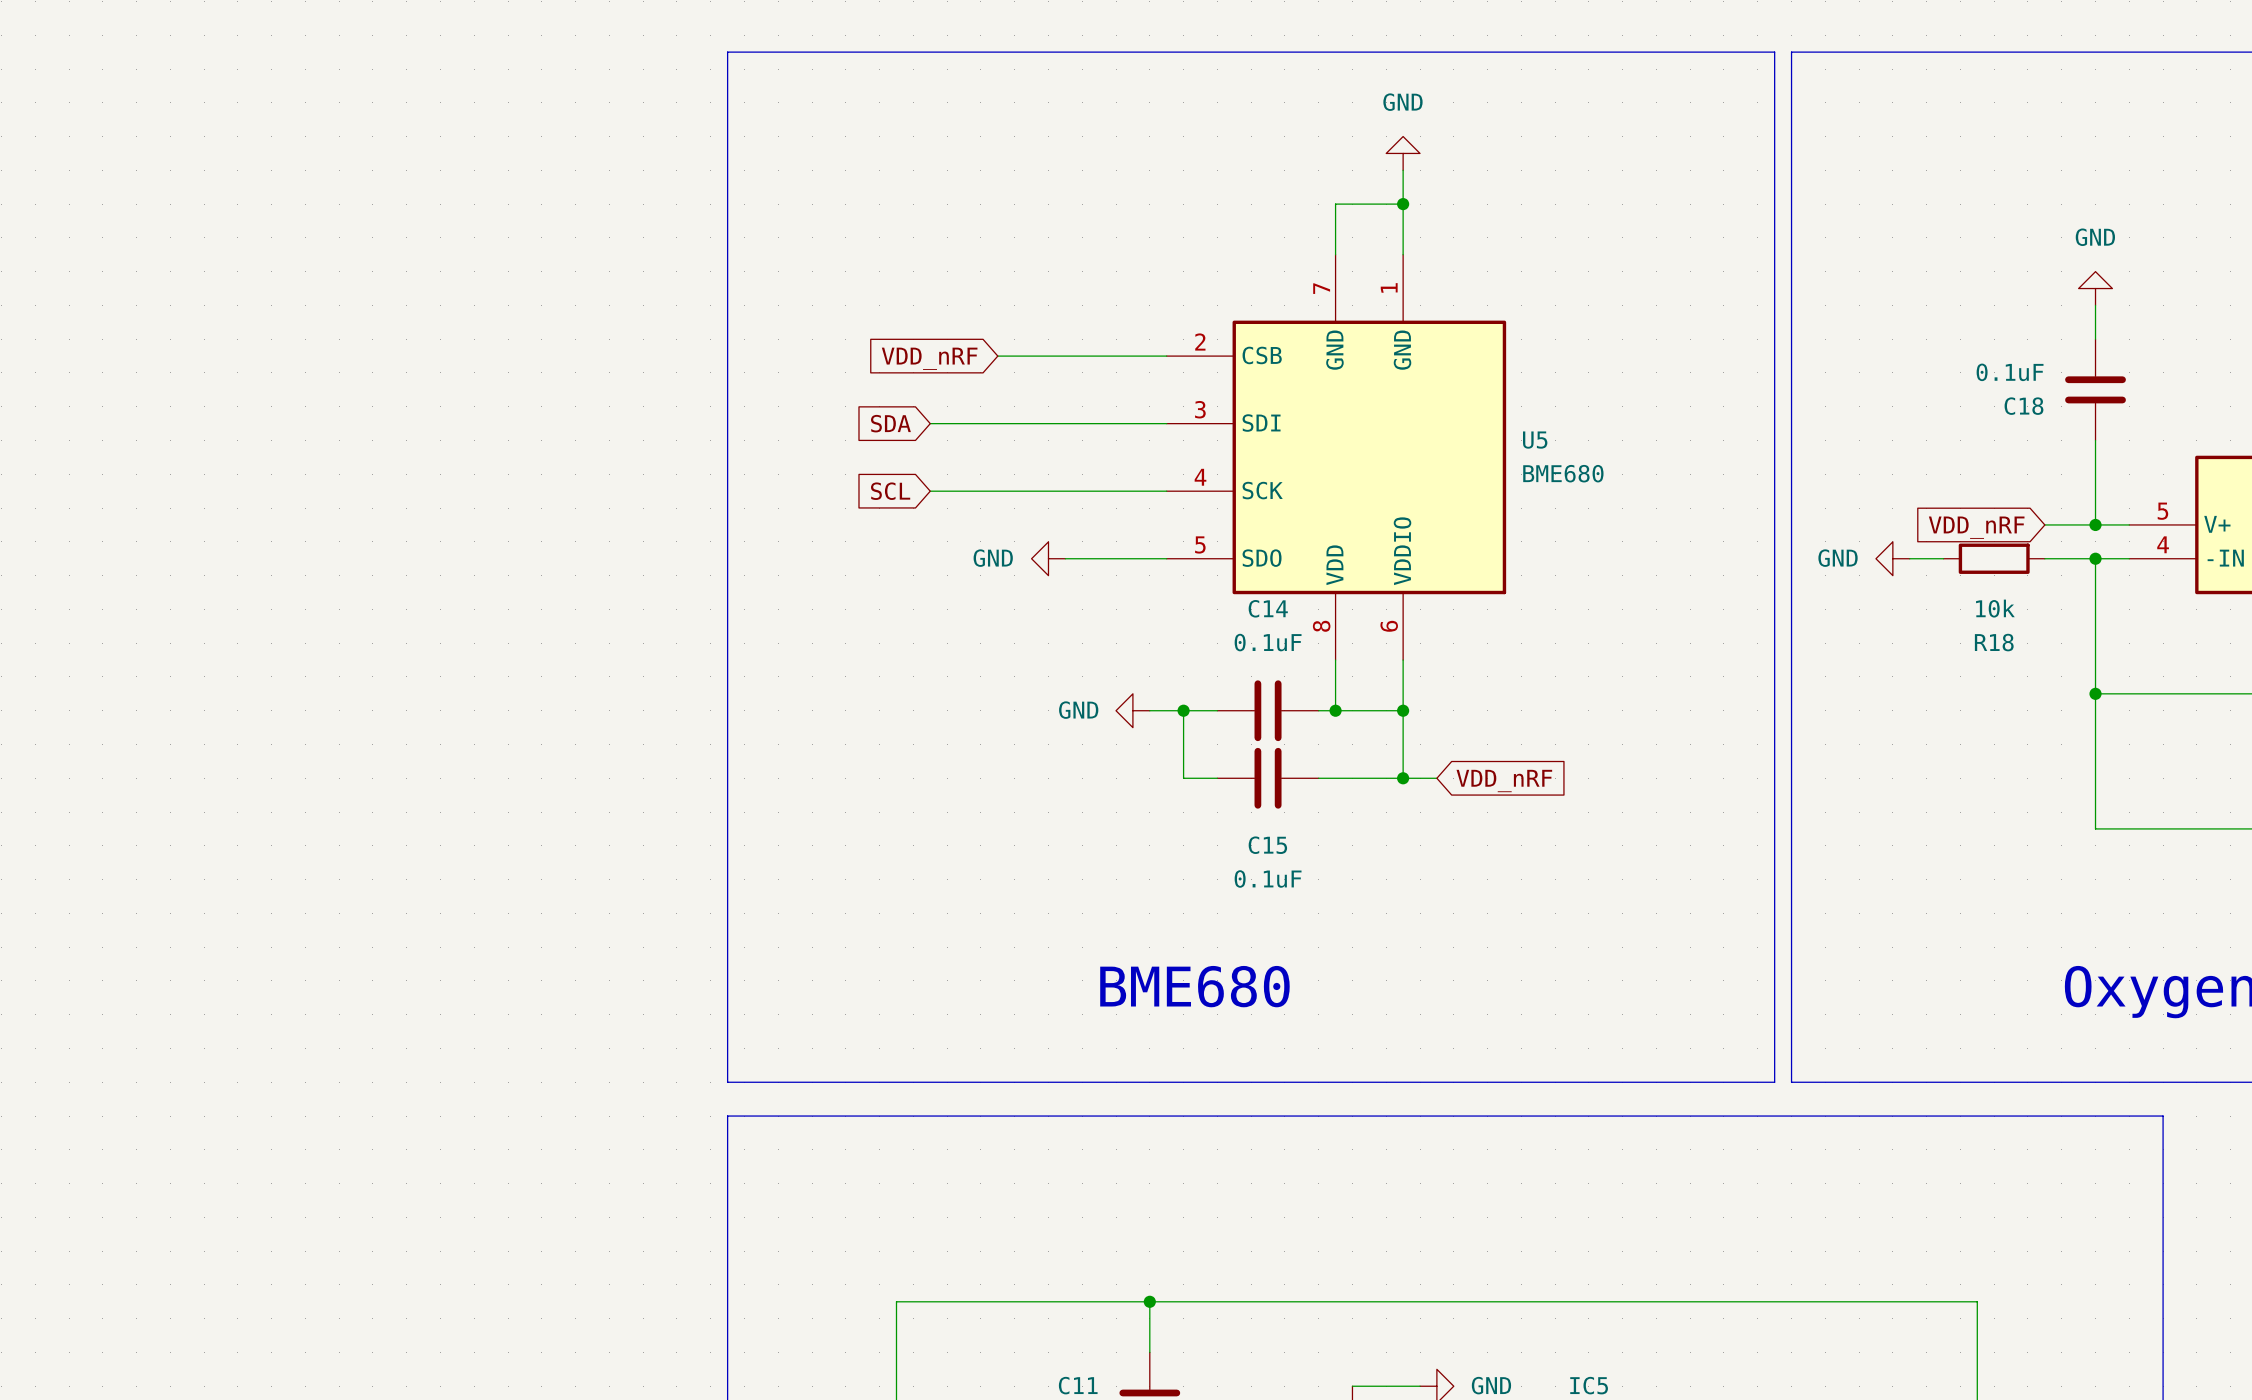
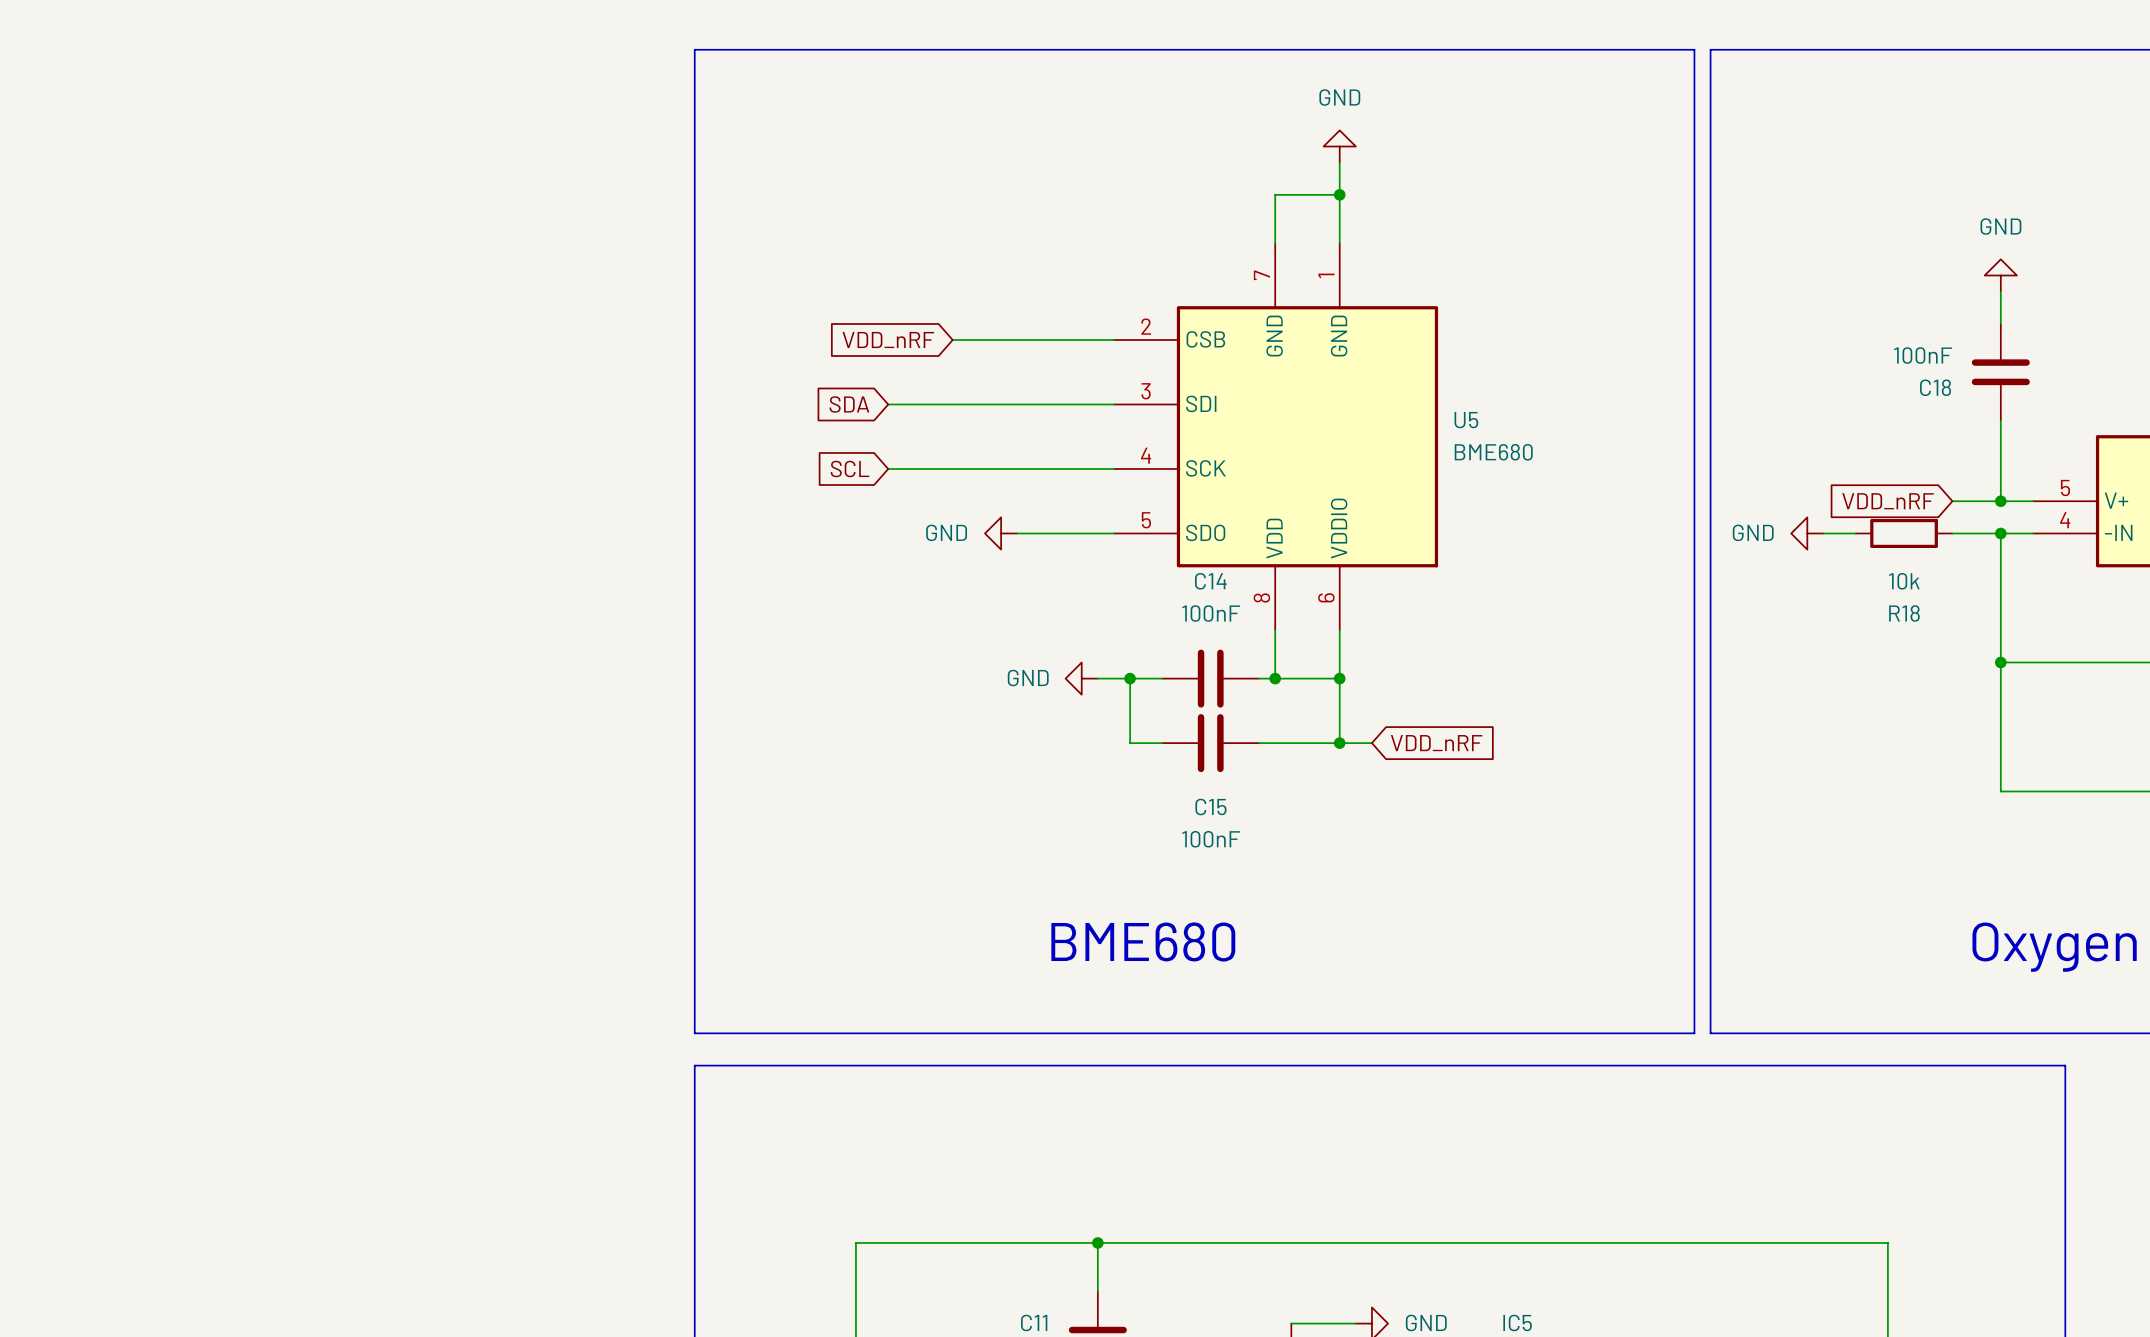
C18 value: 0.1uF (2010, 372) -> 100nF (1923, 355)
C14 value: 0.1uF (1268, 642) -> 100nF (1211, 613)
C15 value: 0.1uF (1268, 878) -> 100nF (1211, 839)

